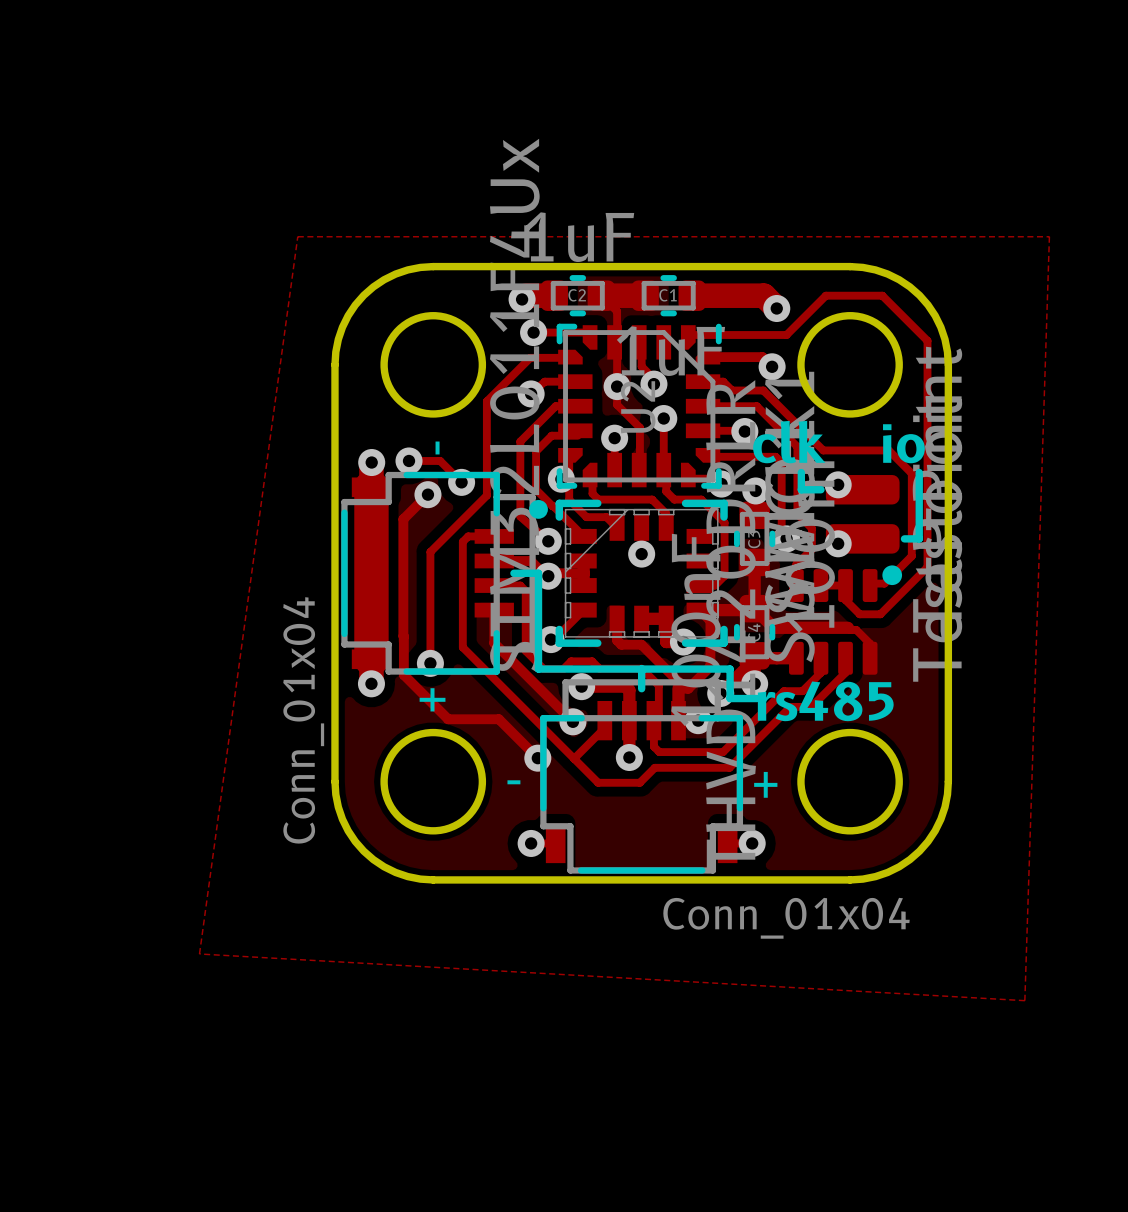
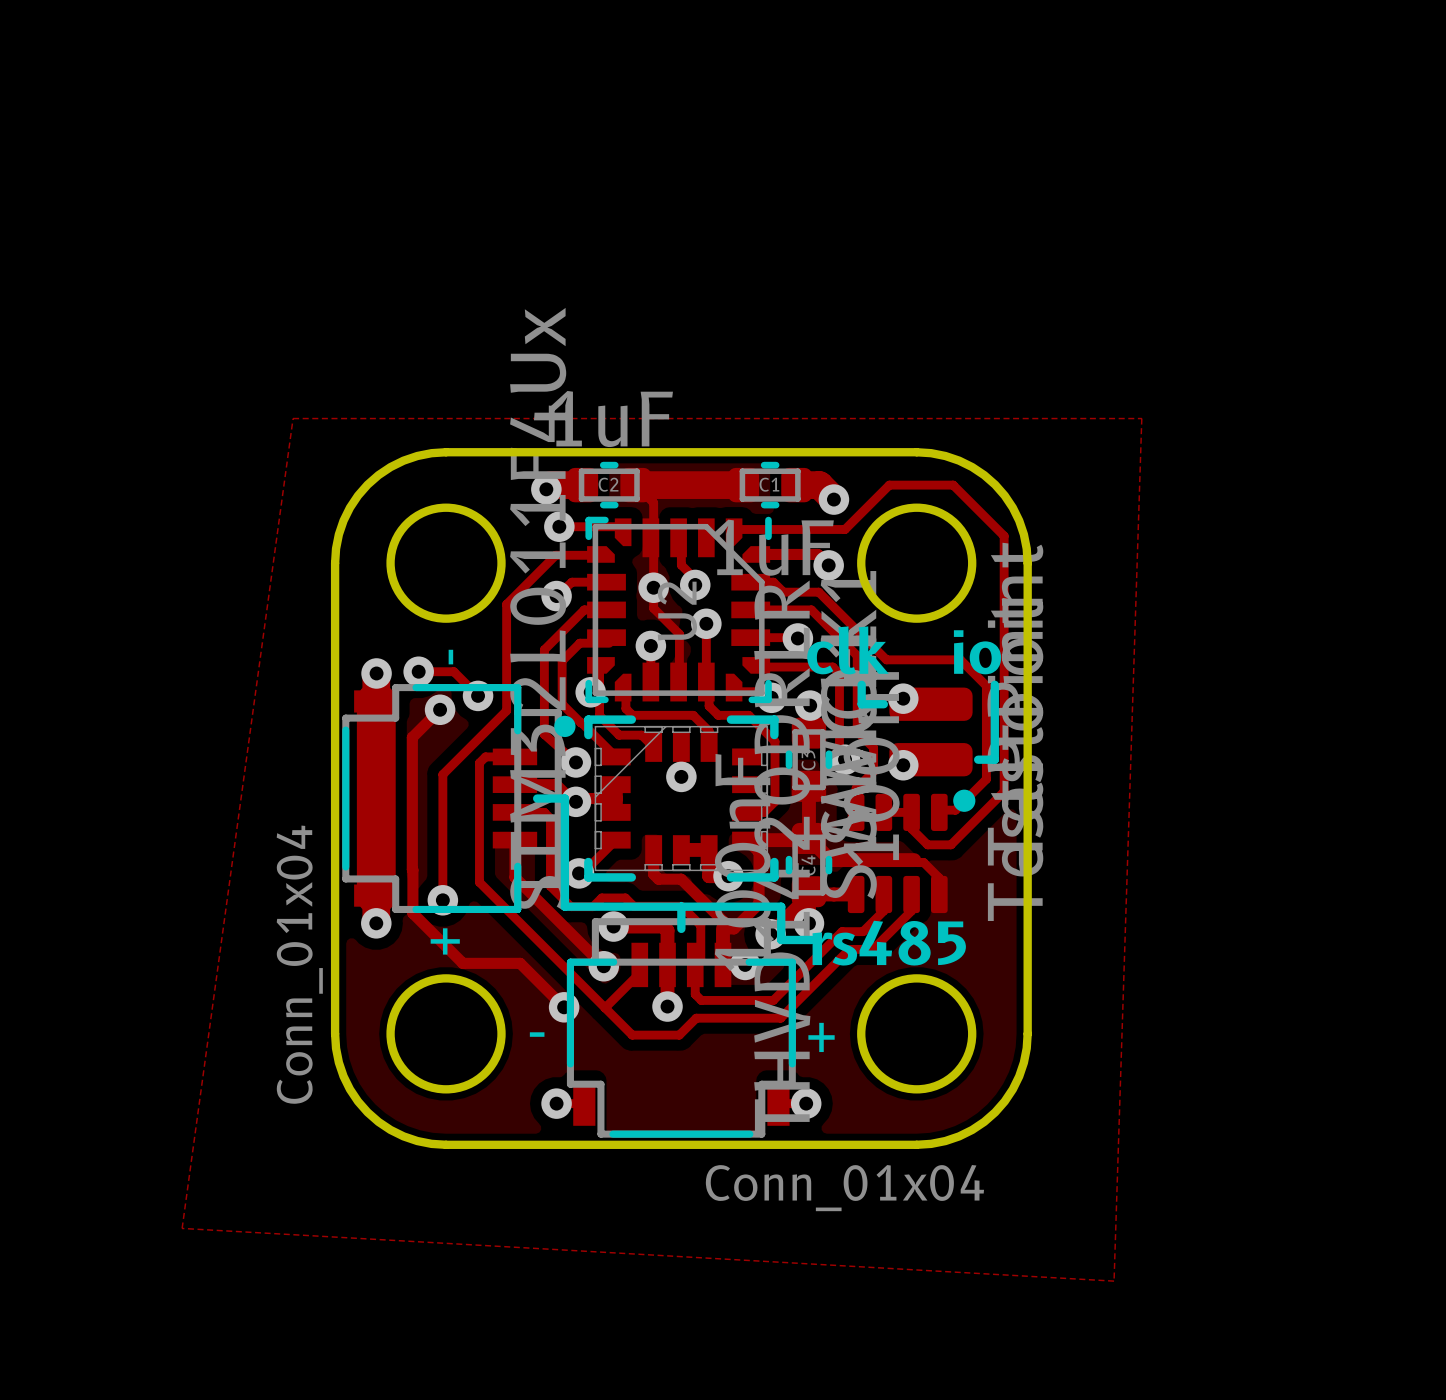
C1 position: (668, 295) -> (770, 485)
track: (696, 295) (743, 295) -> (685, 485) (738, 485)

